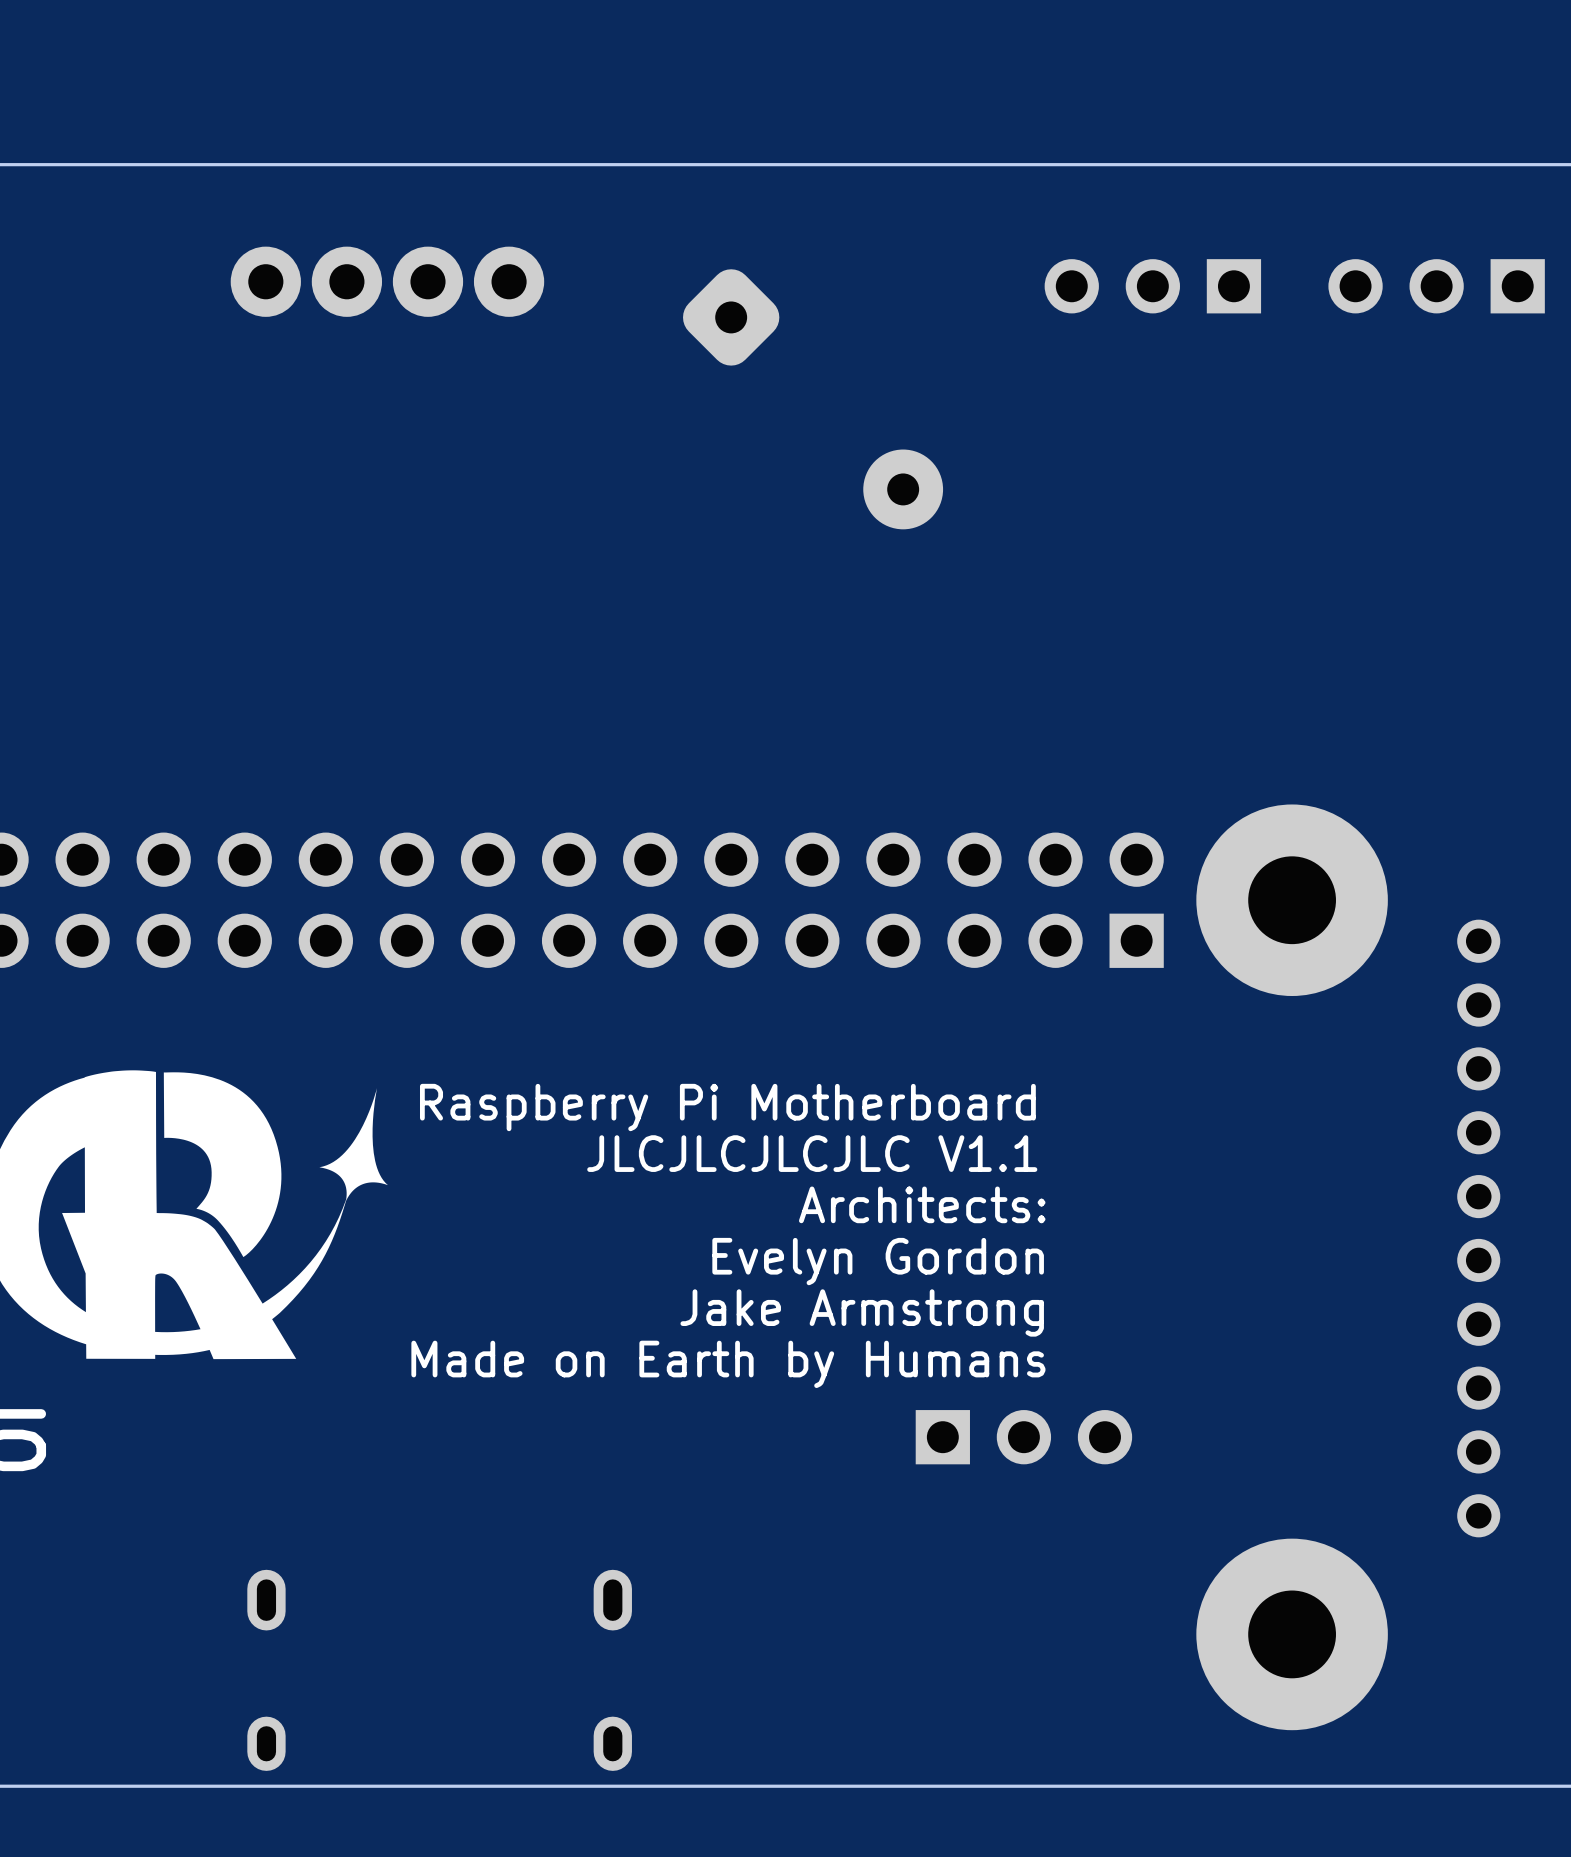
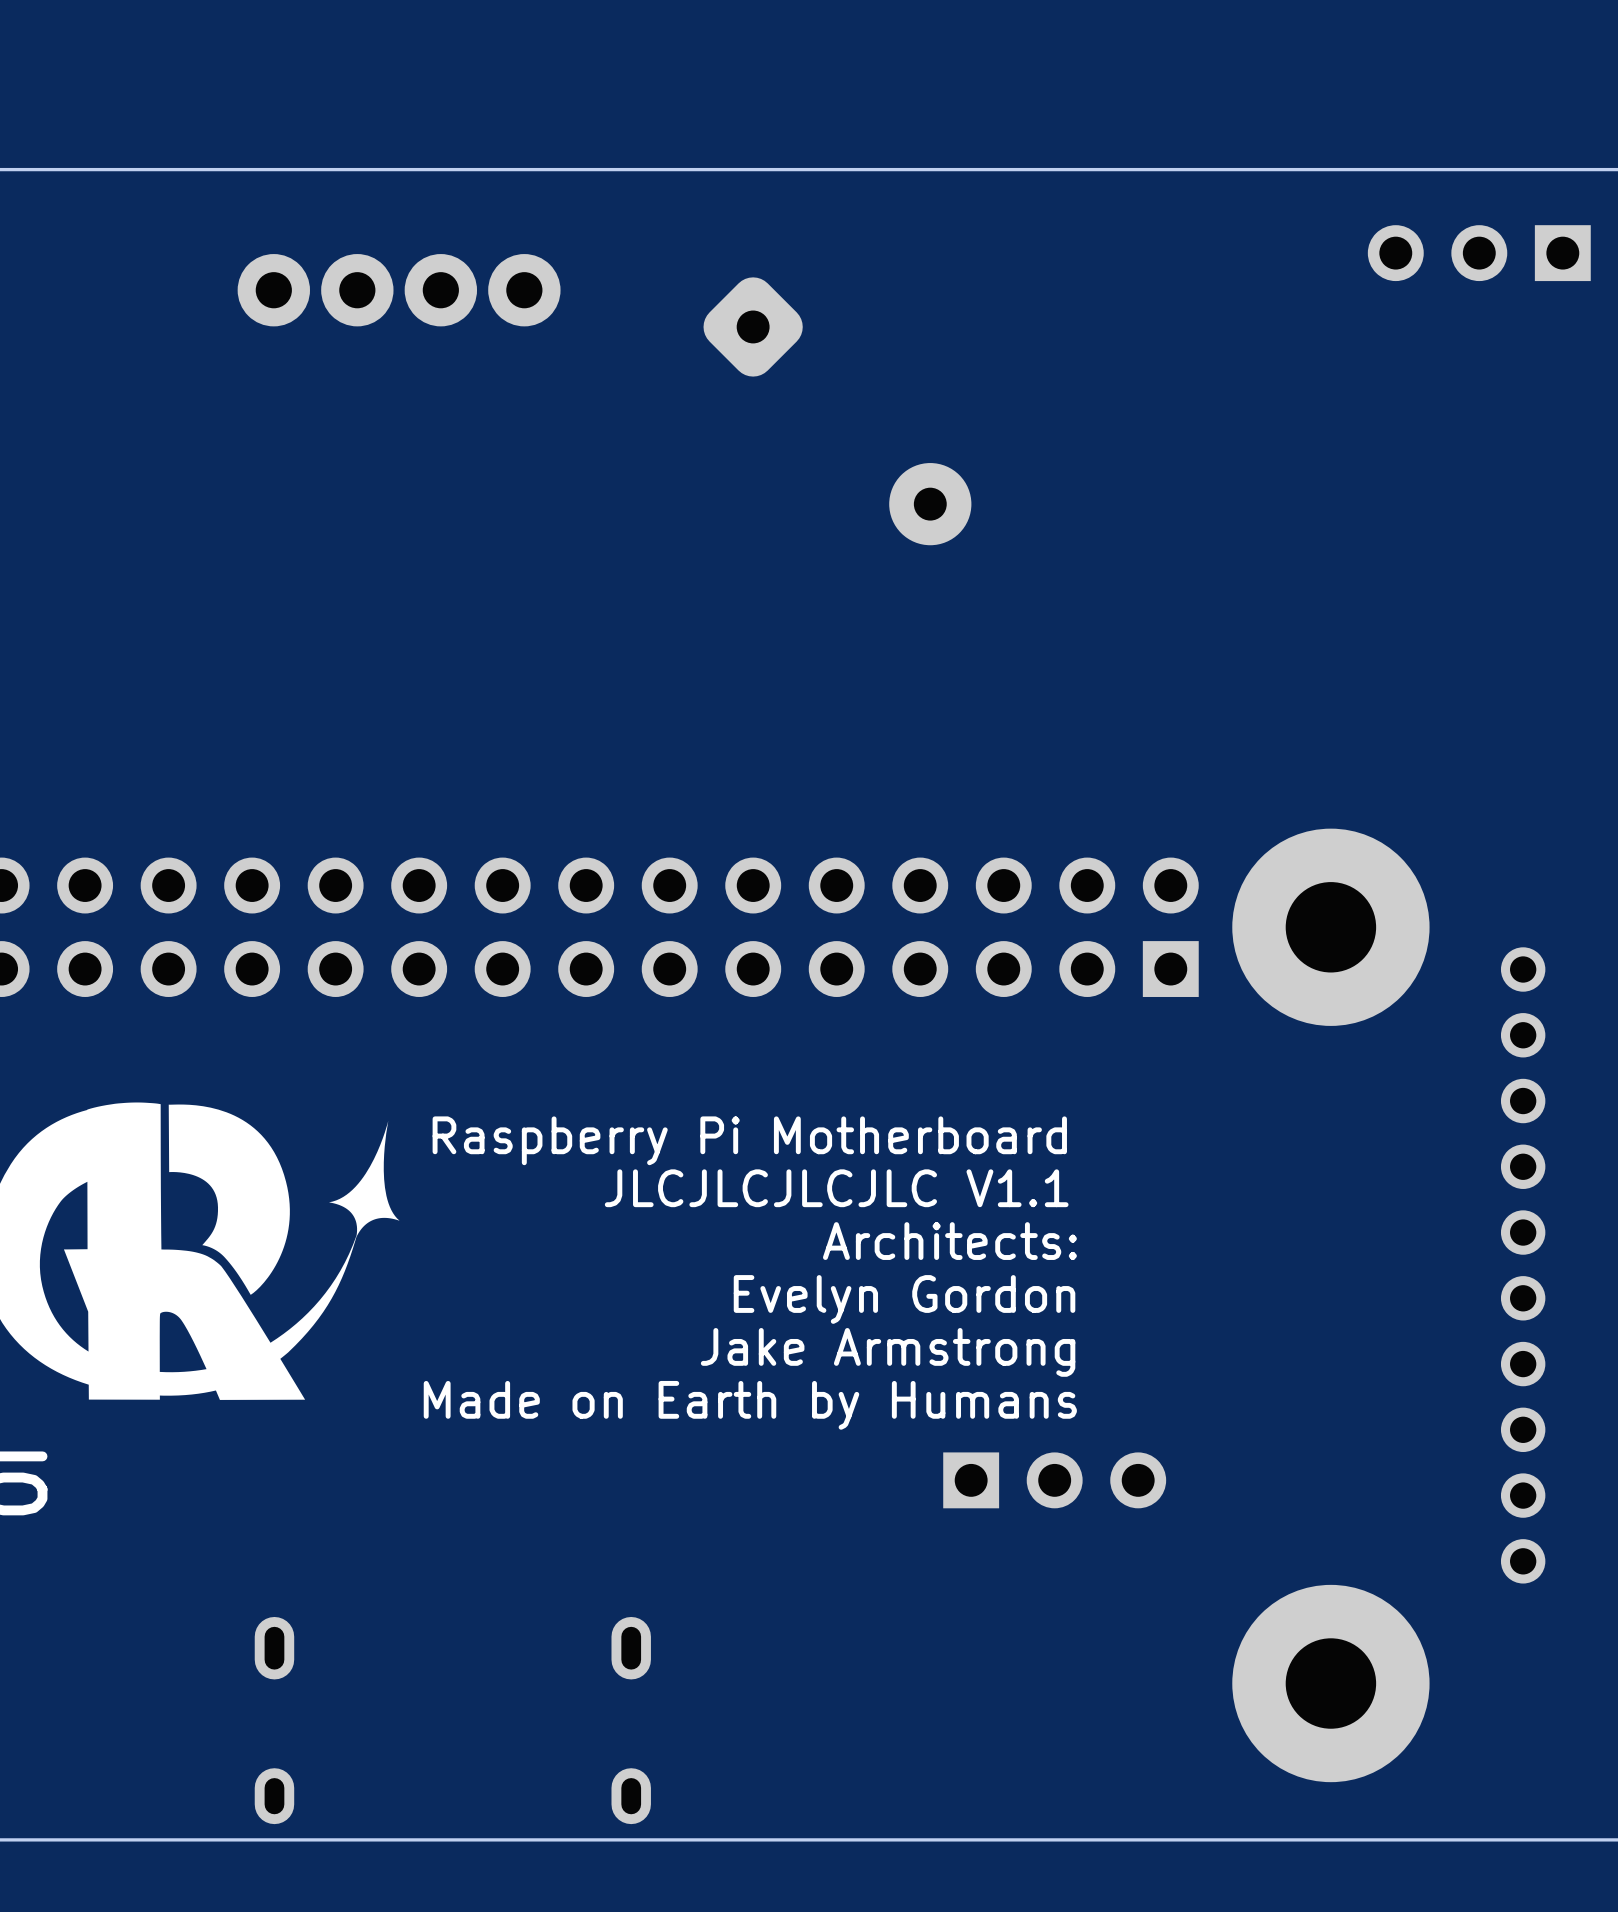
part: (1152, 286) -> none
part position: (1436, 286) -> (1479, 253)

